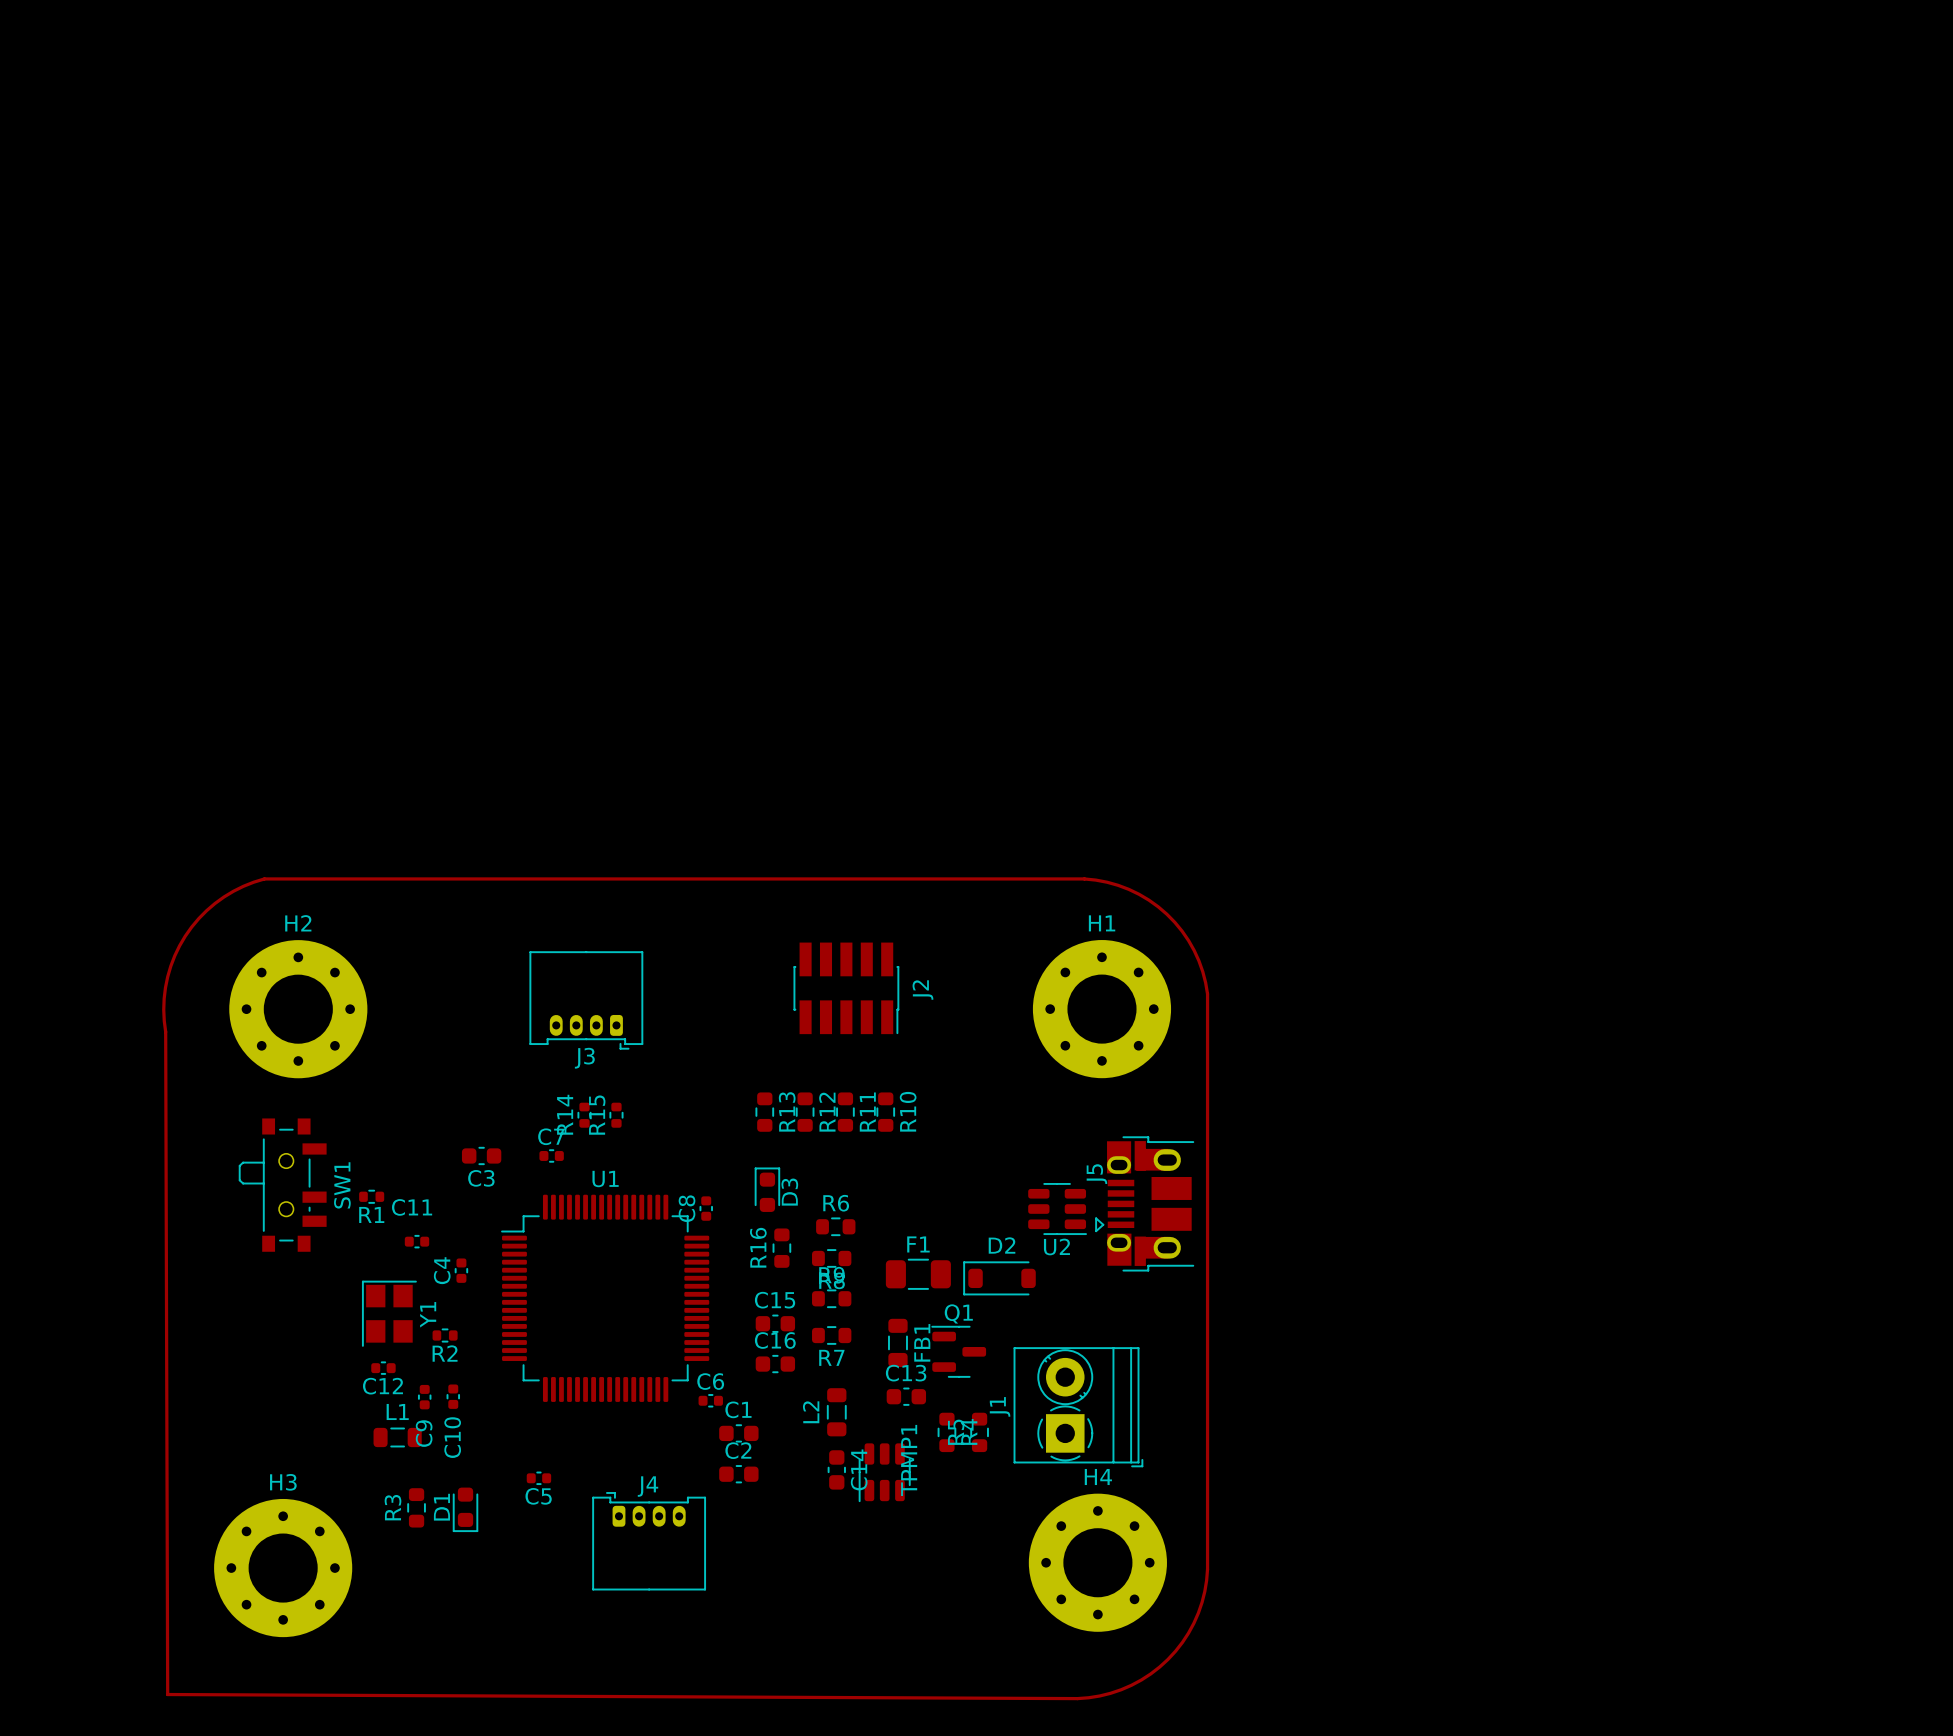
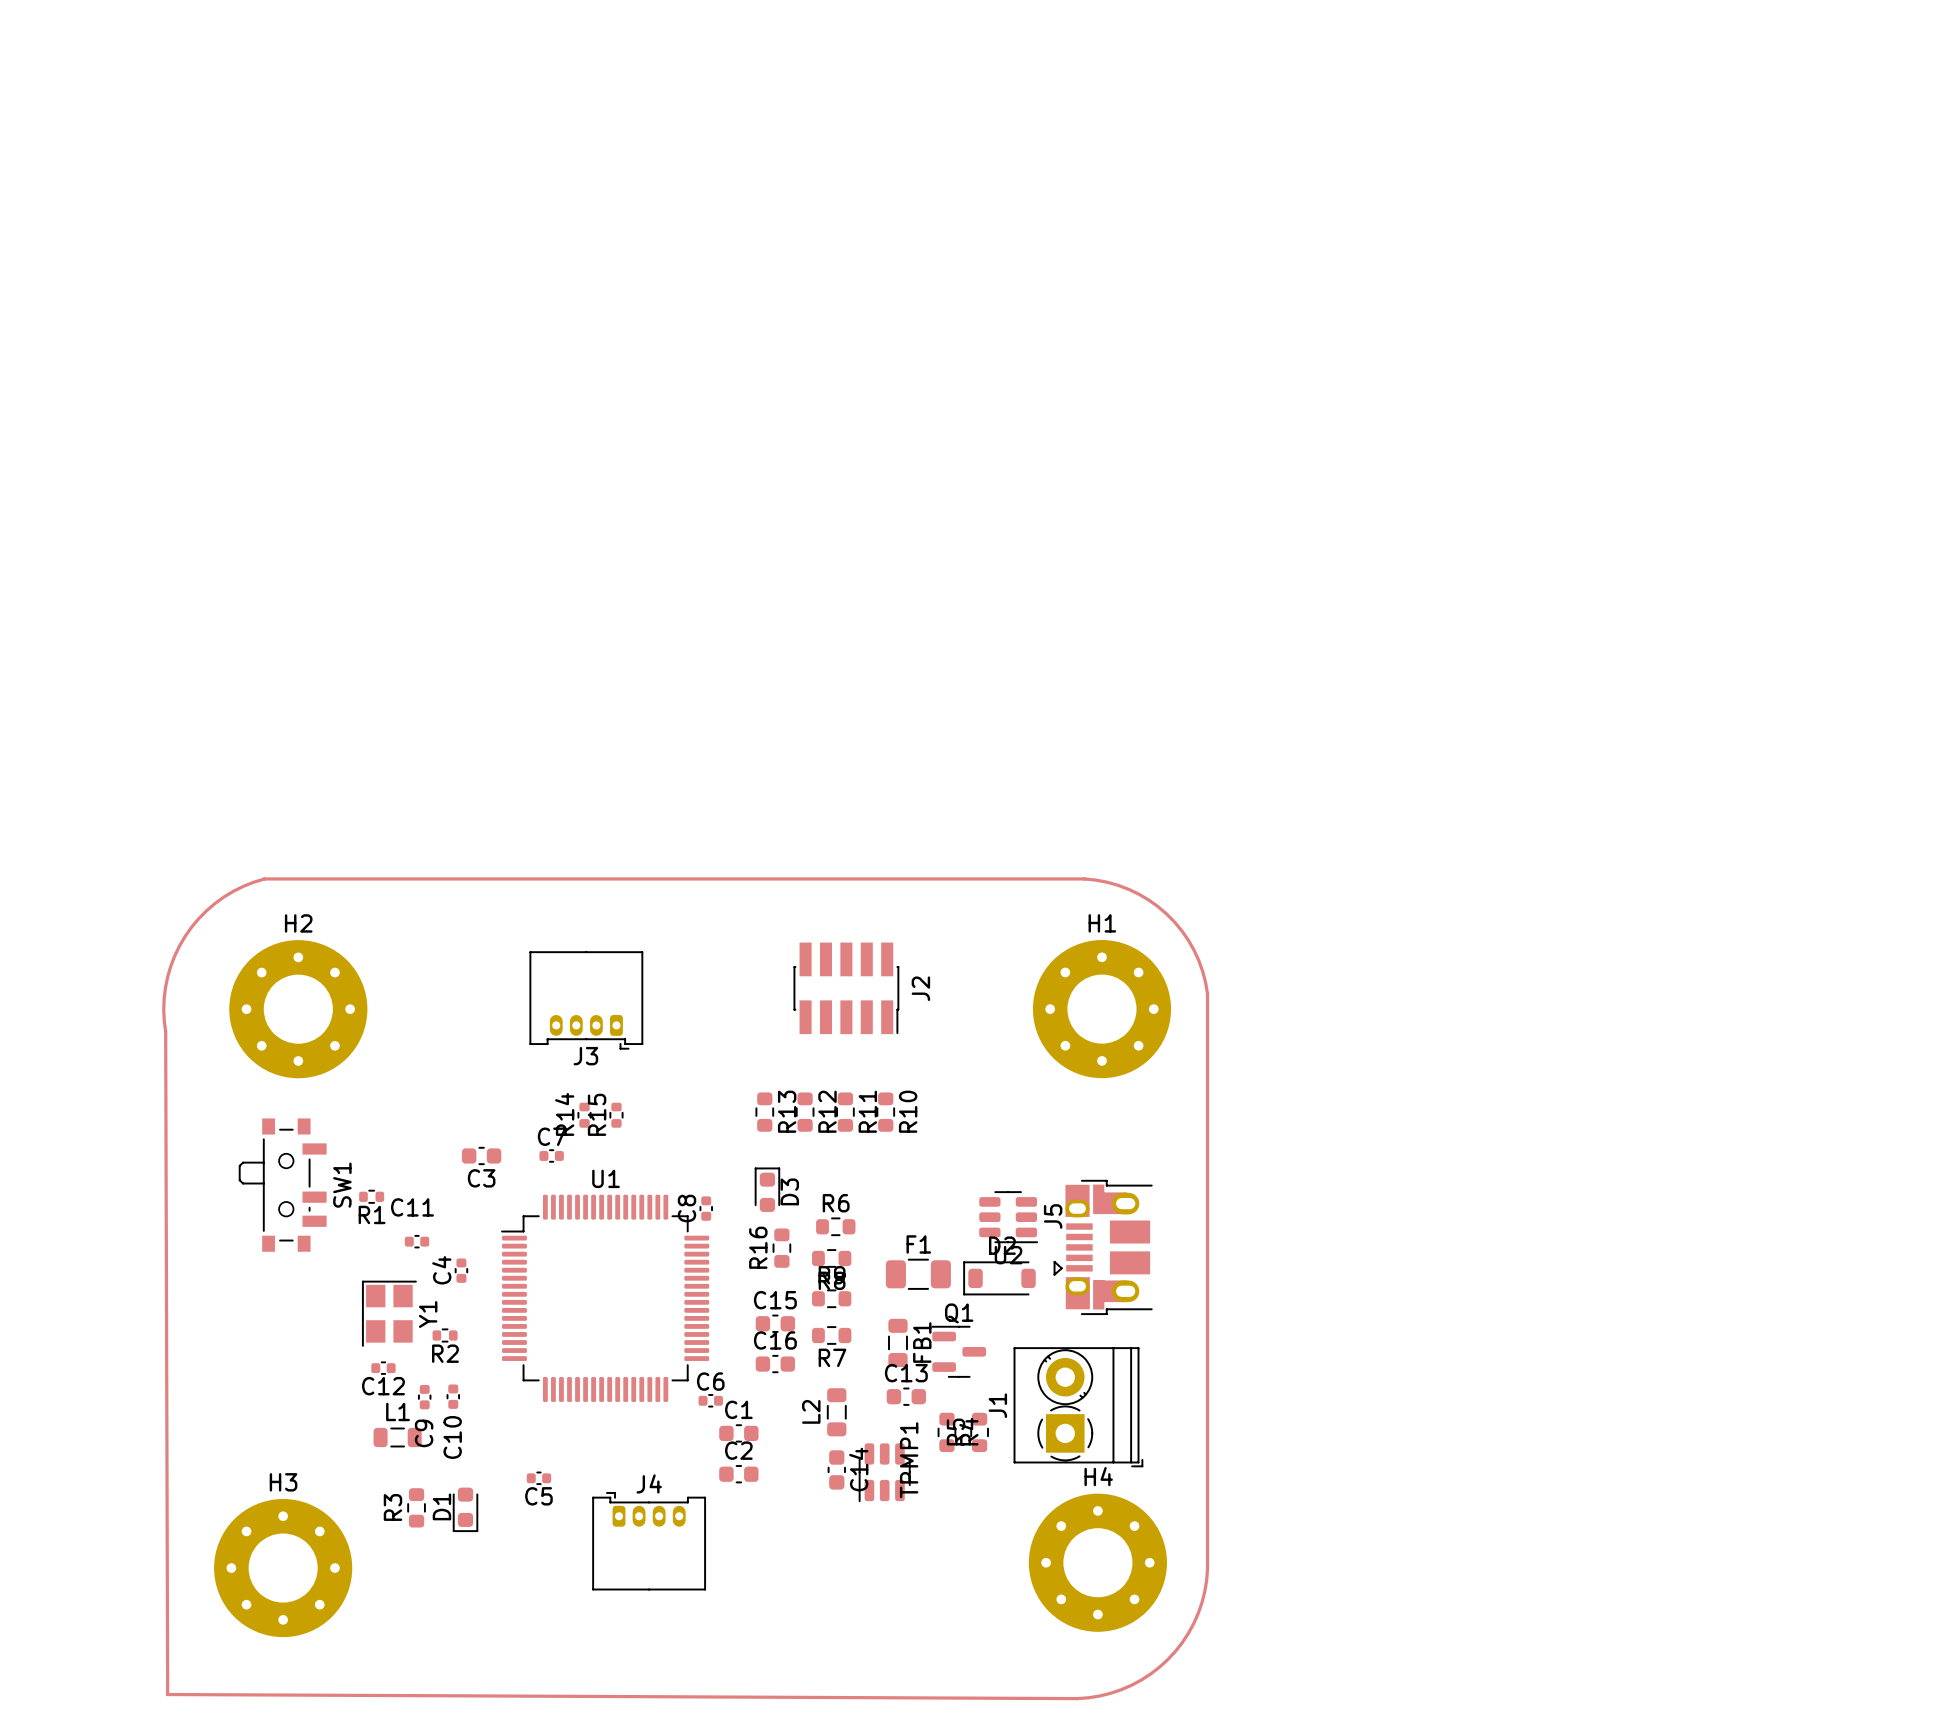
J5 position: (1144, 1203) -> (1103, 1247)
U2 position: (1057, 1209) -> (1008, 1217)

